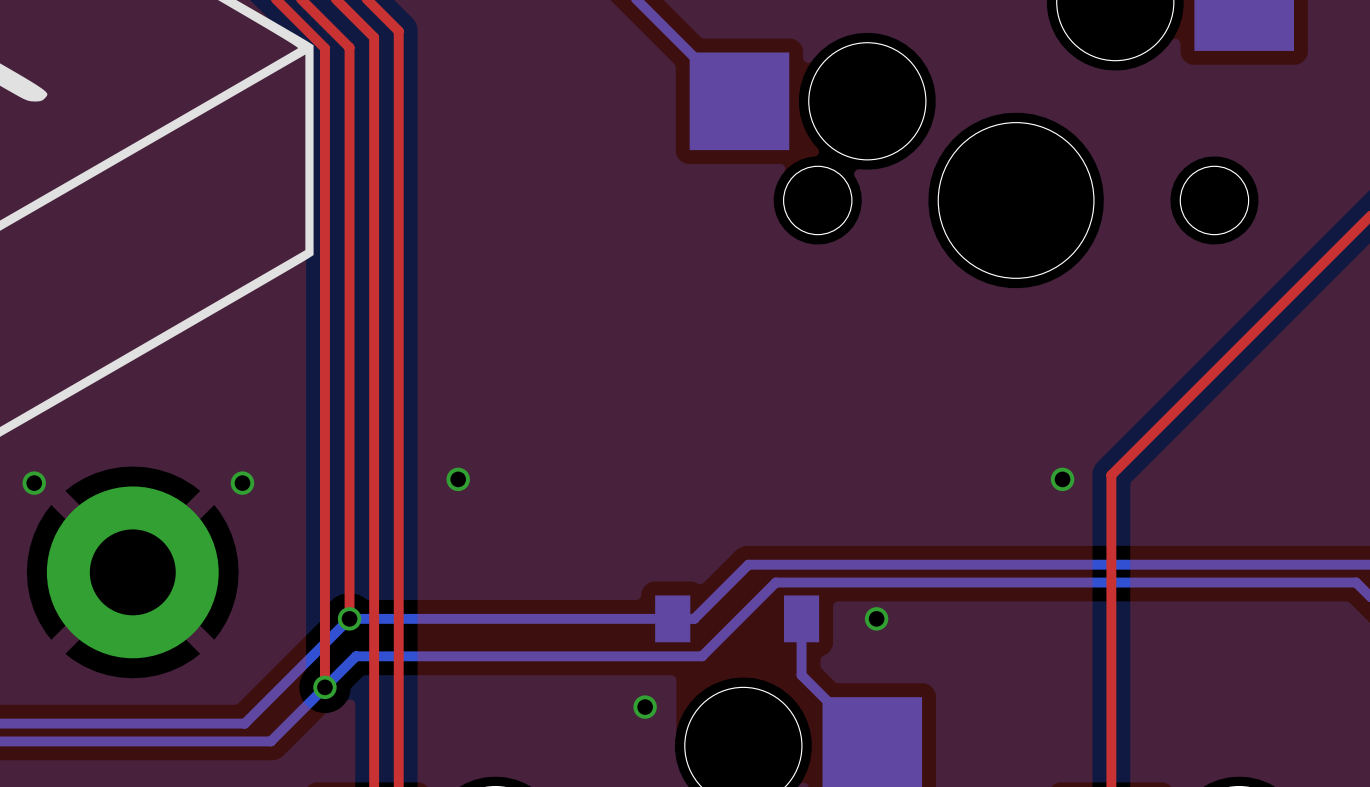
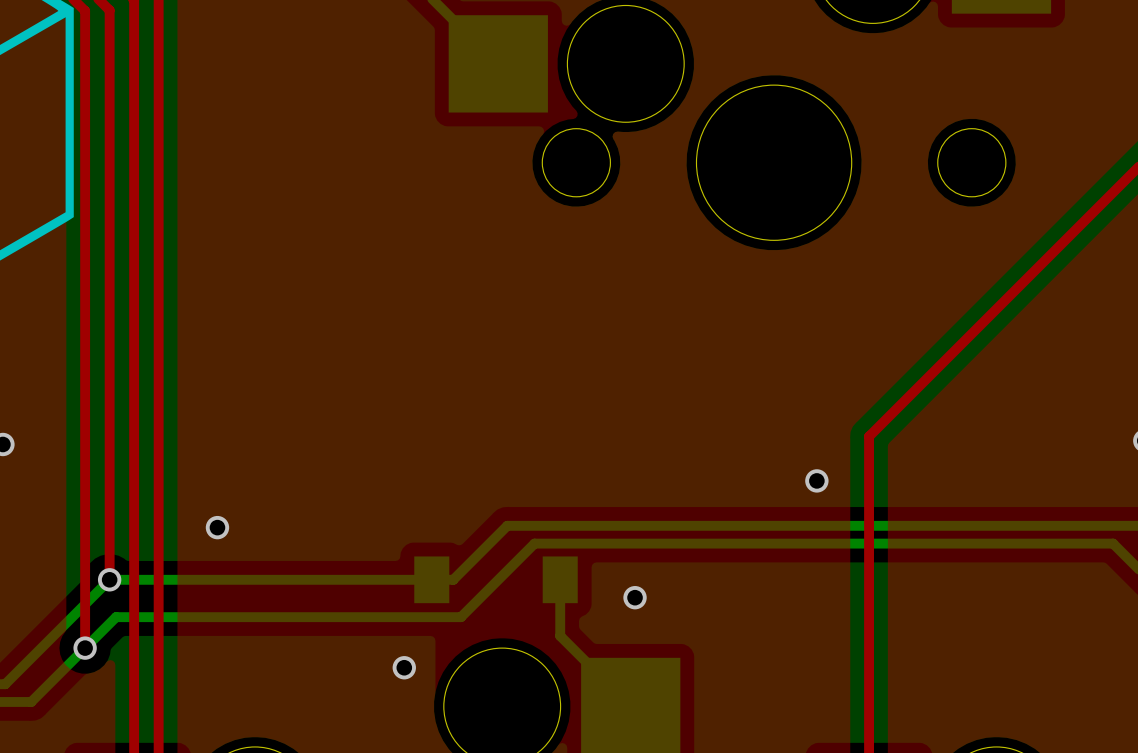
via position: (458, 479) -> (217, 527)
via position: (1062, 479) -> (816, 480)
via position: (876, 618) -> (635, 597)

